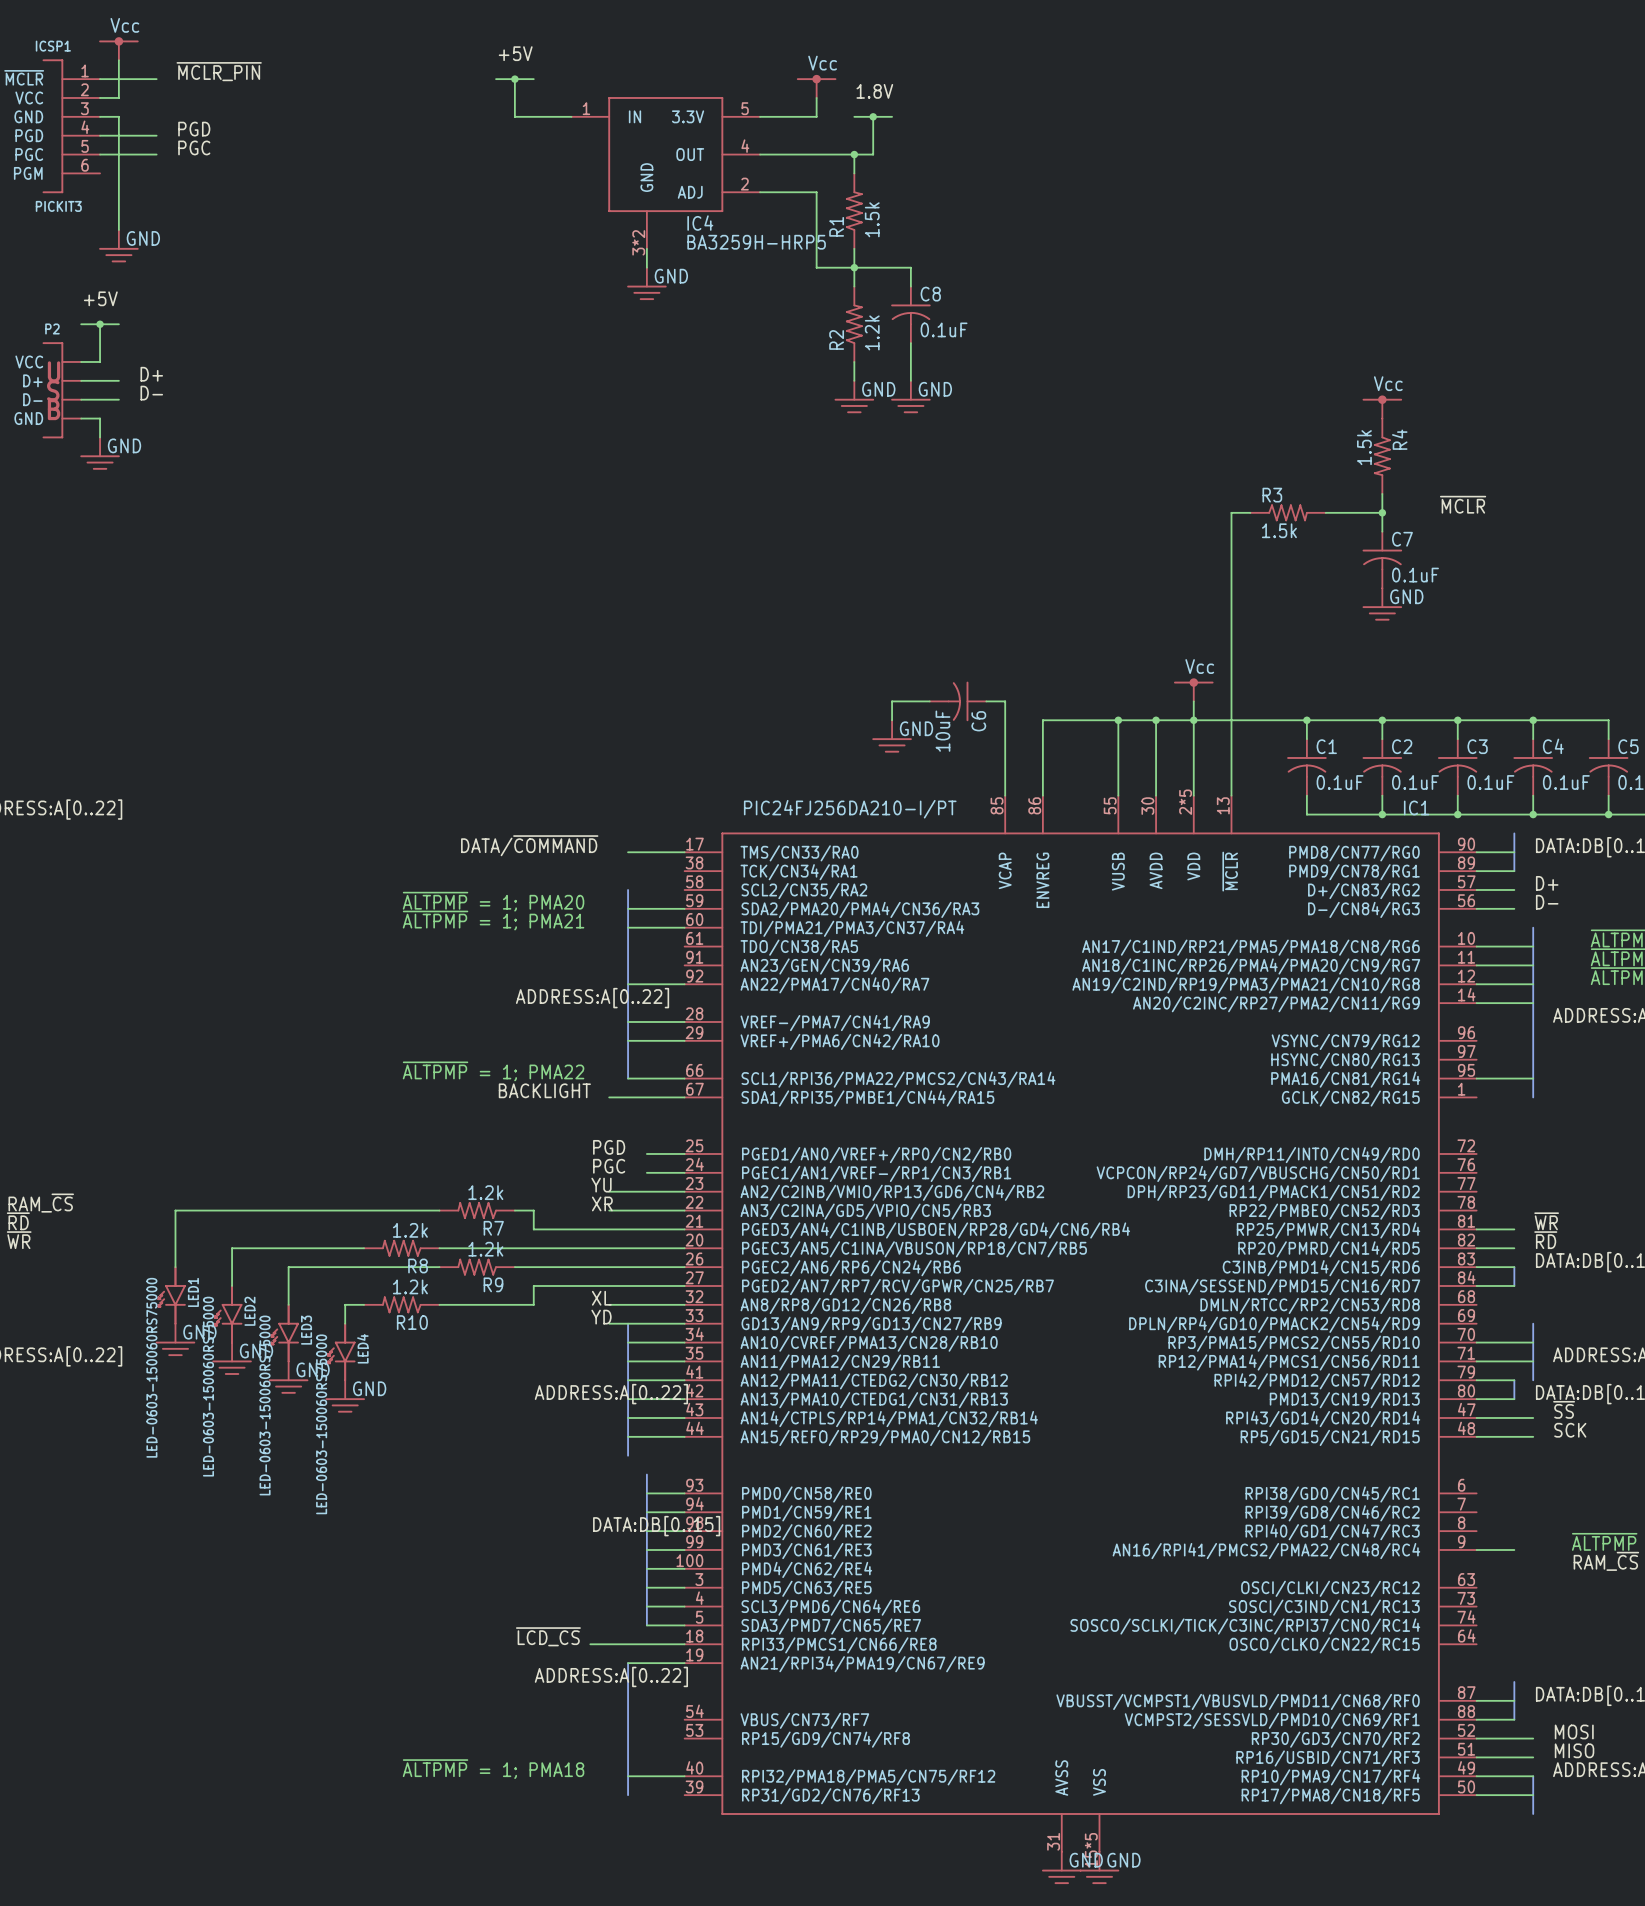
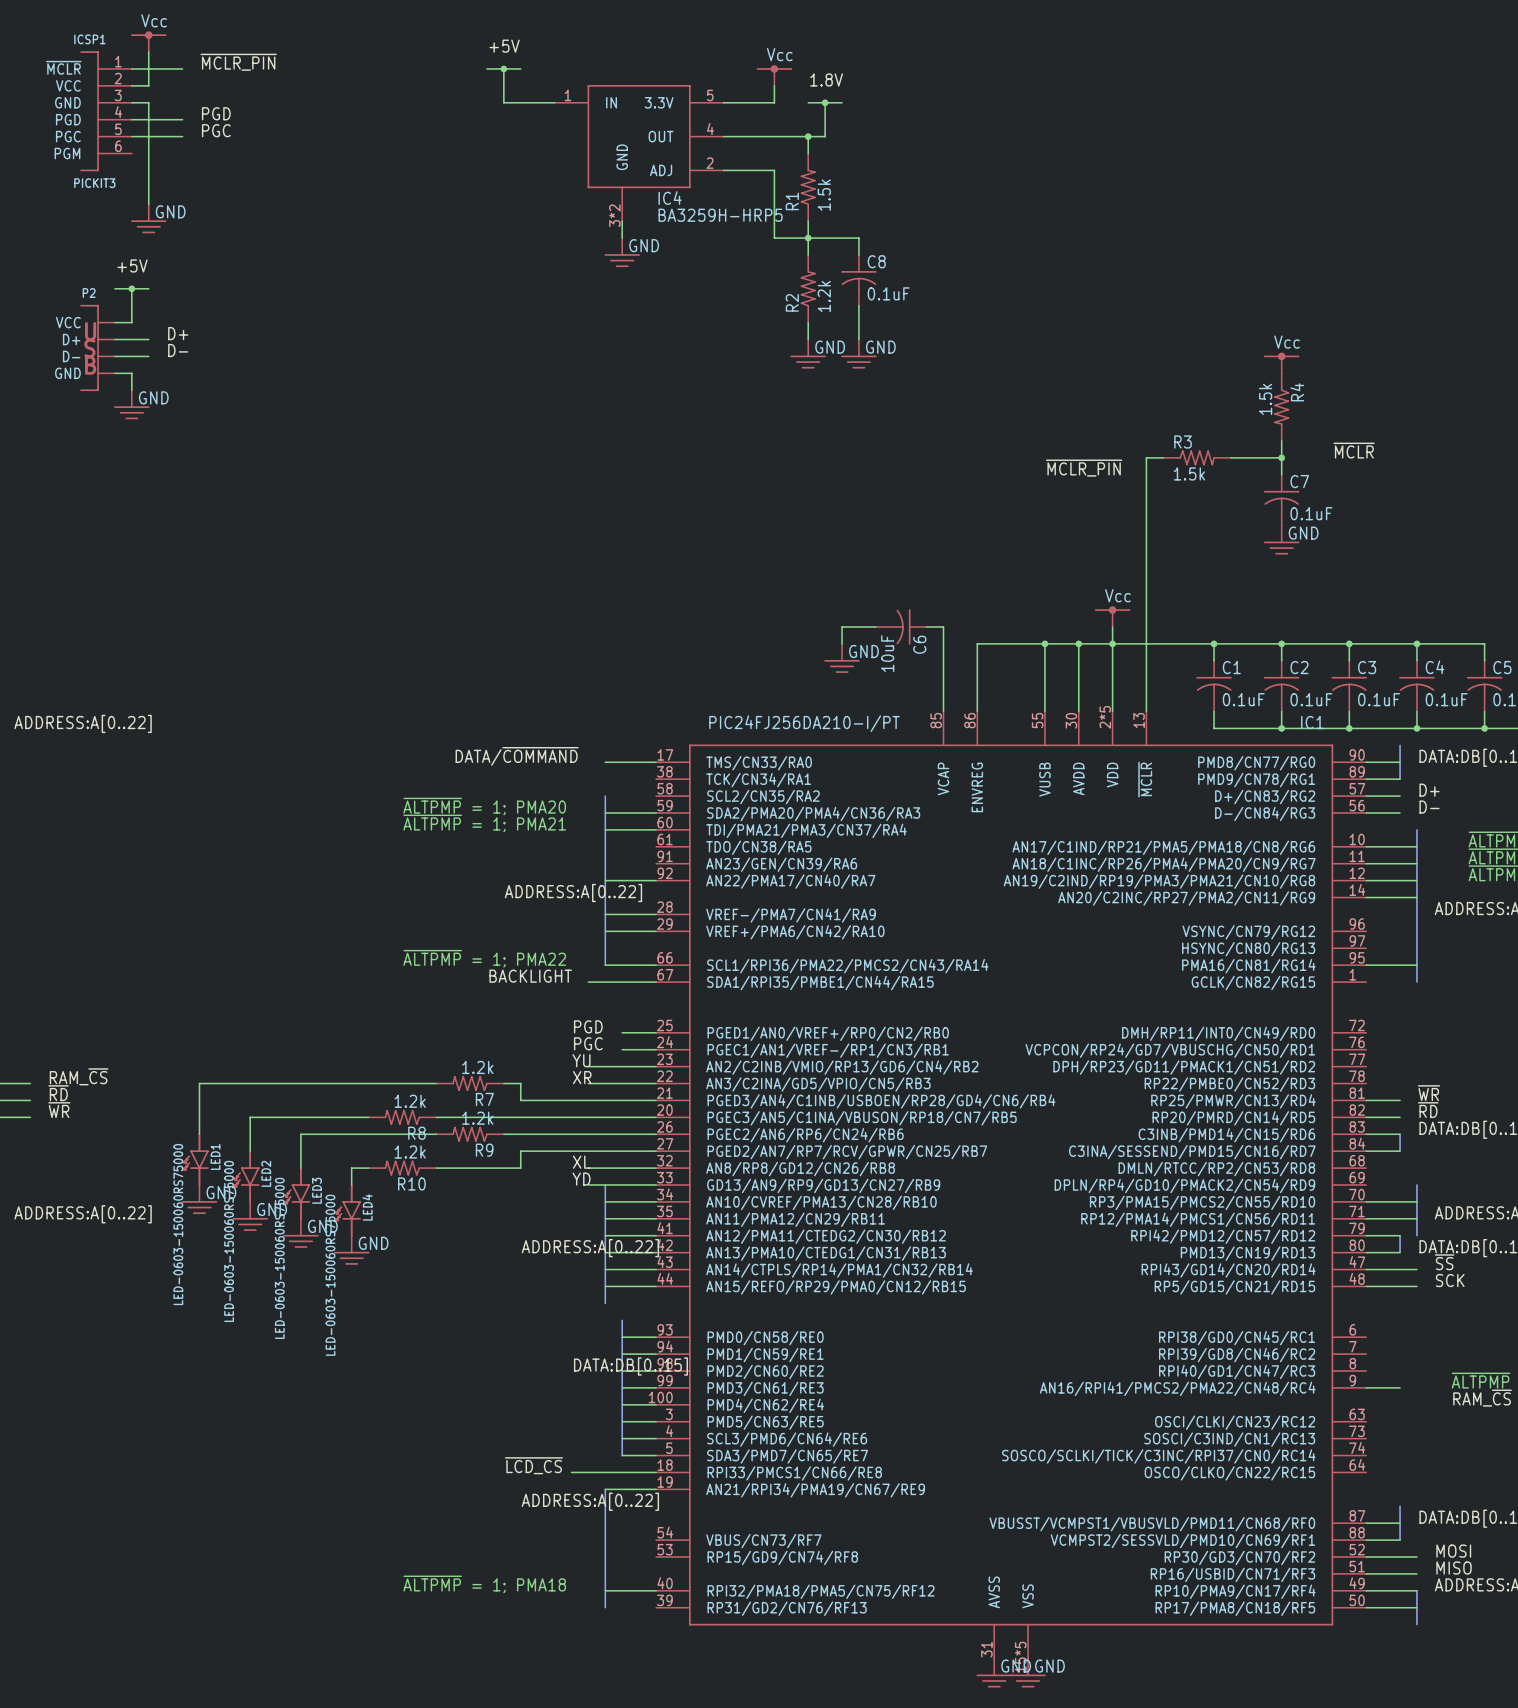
label: none -> ~{MCLR_PIN} (1084, 468)

